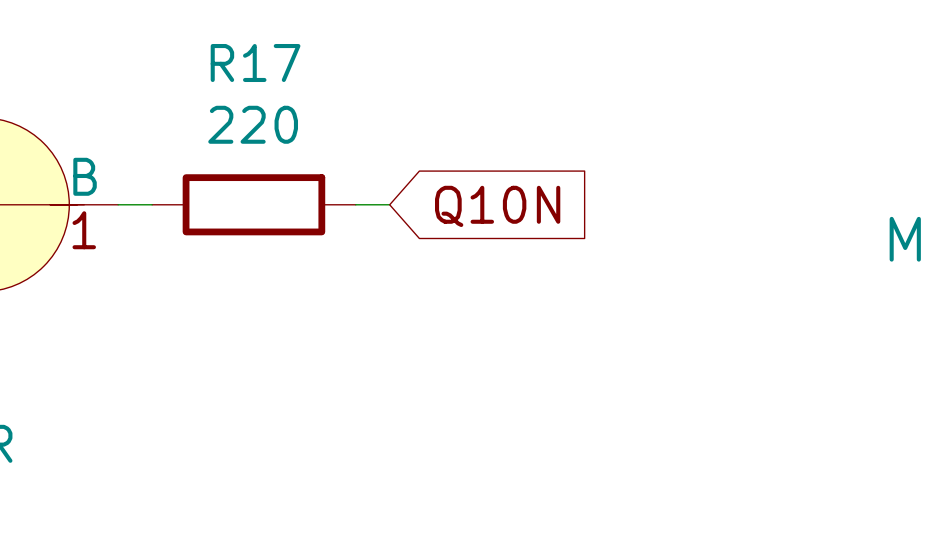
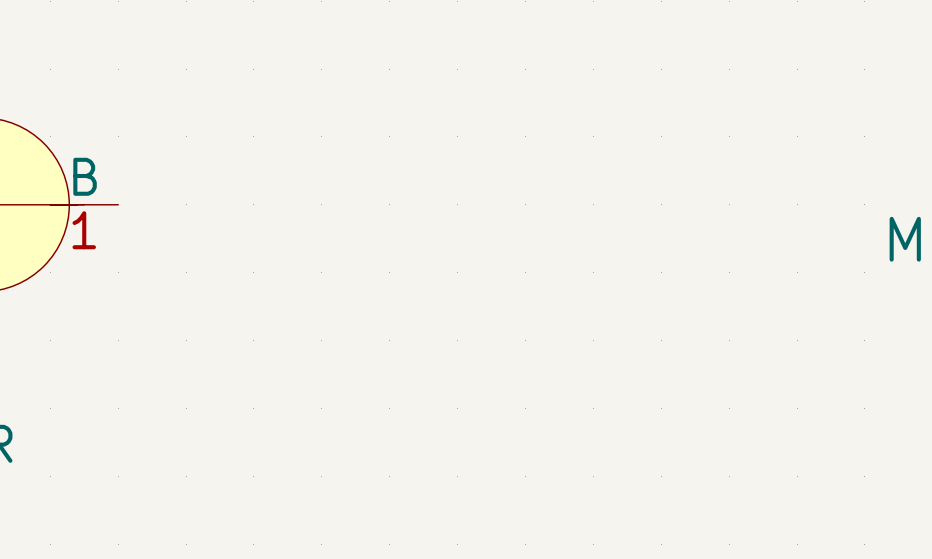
wire: (118, 204) (152, 204) -> none
R17: 220 (253, 204) -> none
wire: (355, 204) (389, 204) -> none
global label: Q10N (497, 206) -> none

